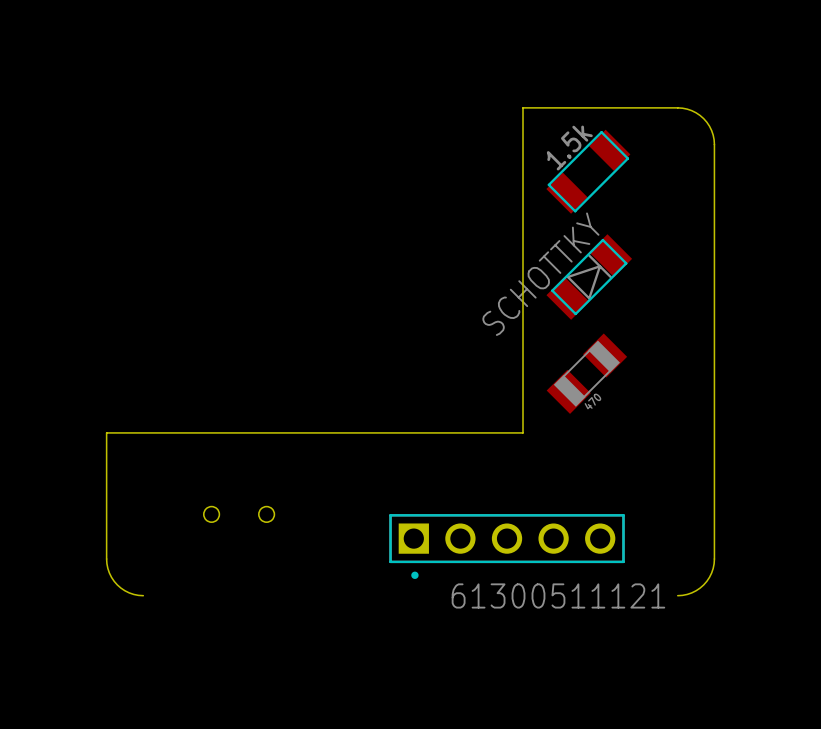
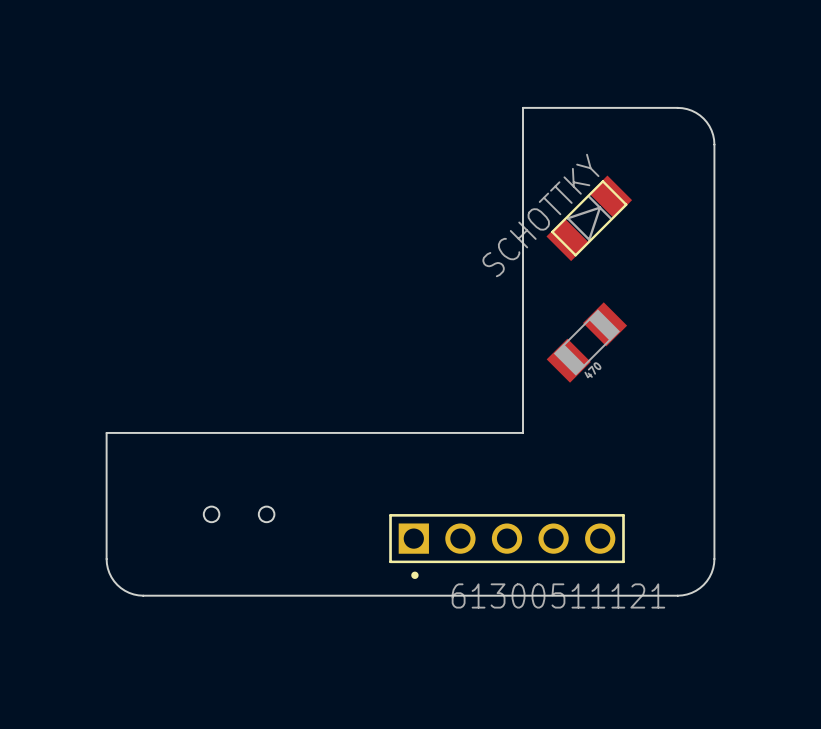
part: 1.5k (588, 171) -> none
part position: (589, 277) -> (589, 218)
part position: (586, 373) -> (586, 342)
board edge: none -> (143, 595) (677, 595)

